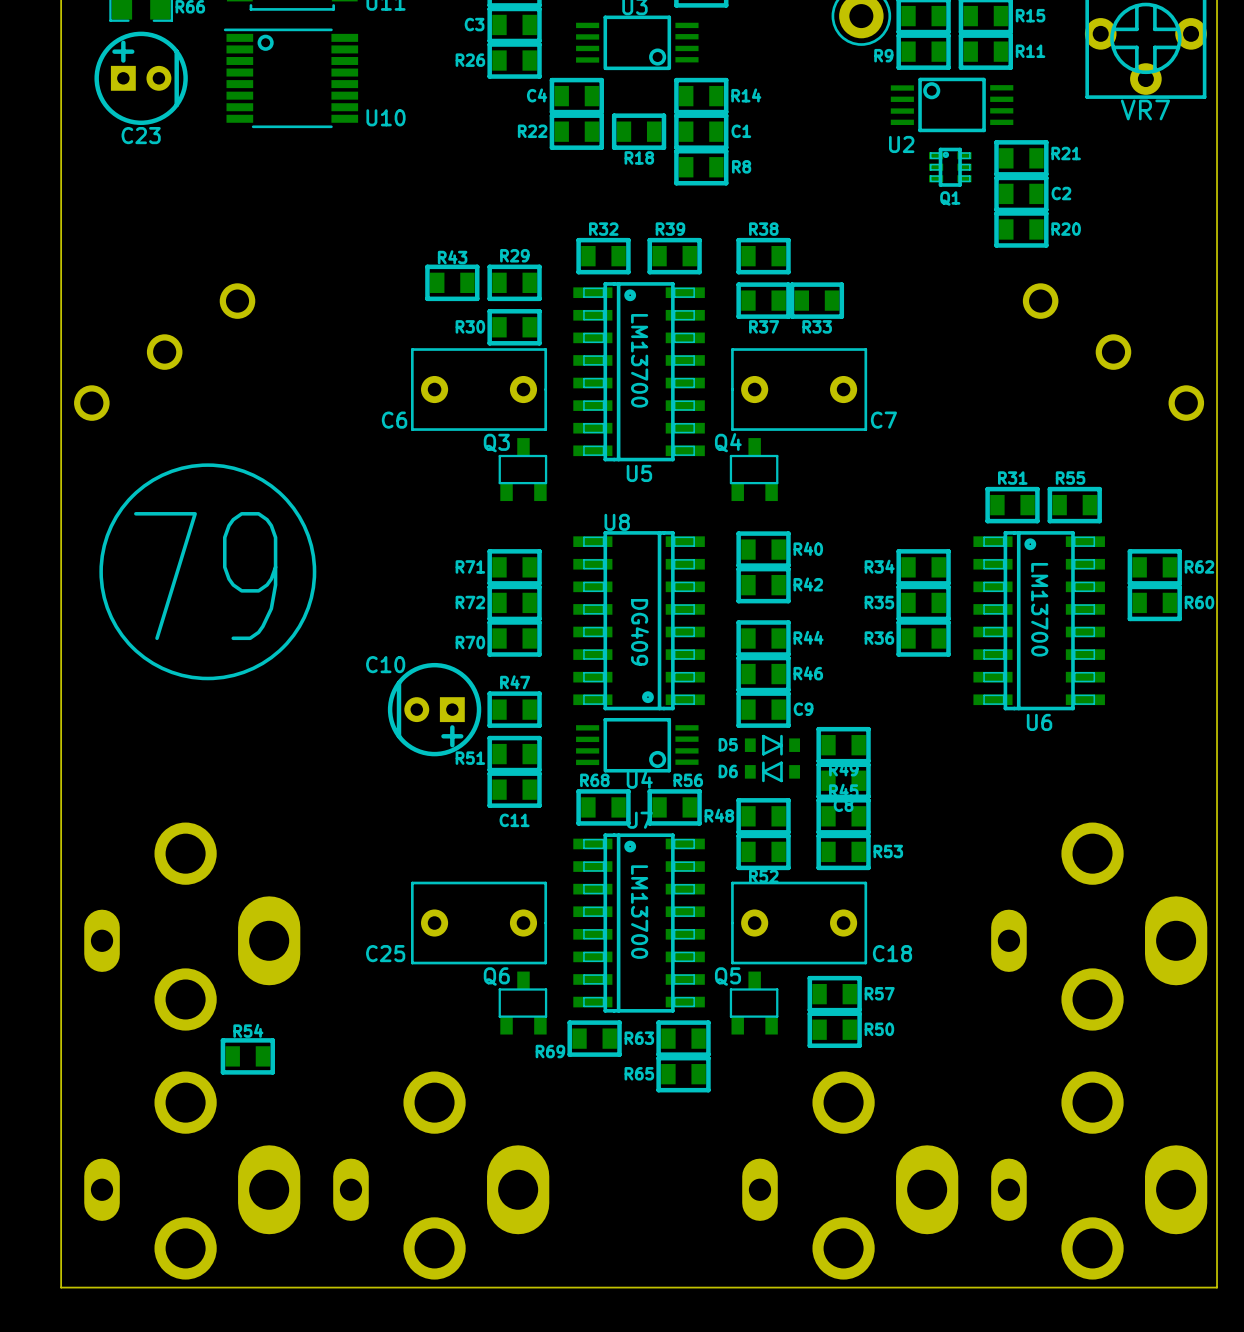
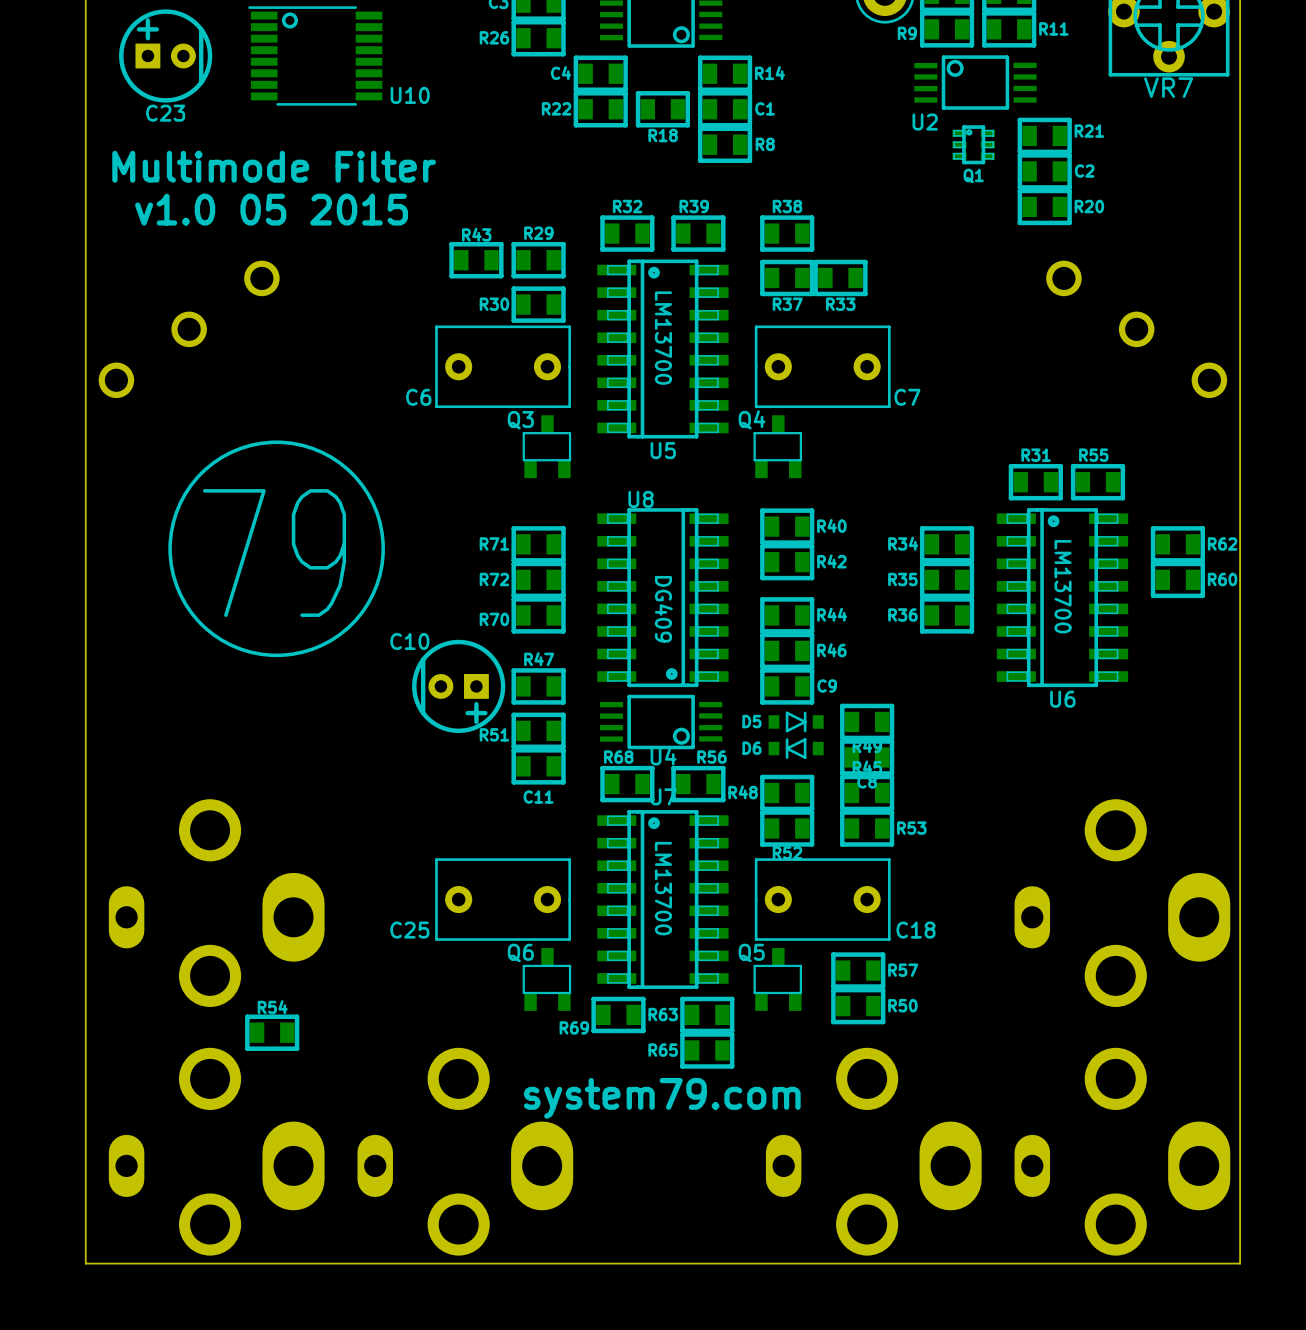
text: none -> Multimode Filter (274, 166)
text: none -> v1.0 05 2015 (271, 209)
drawing position: (207, 571) -> (276, 548)
text: none -> system79.com (662, 1098)

